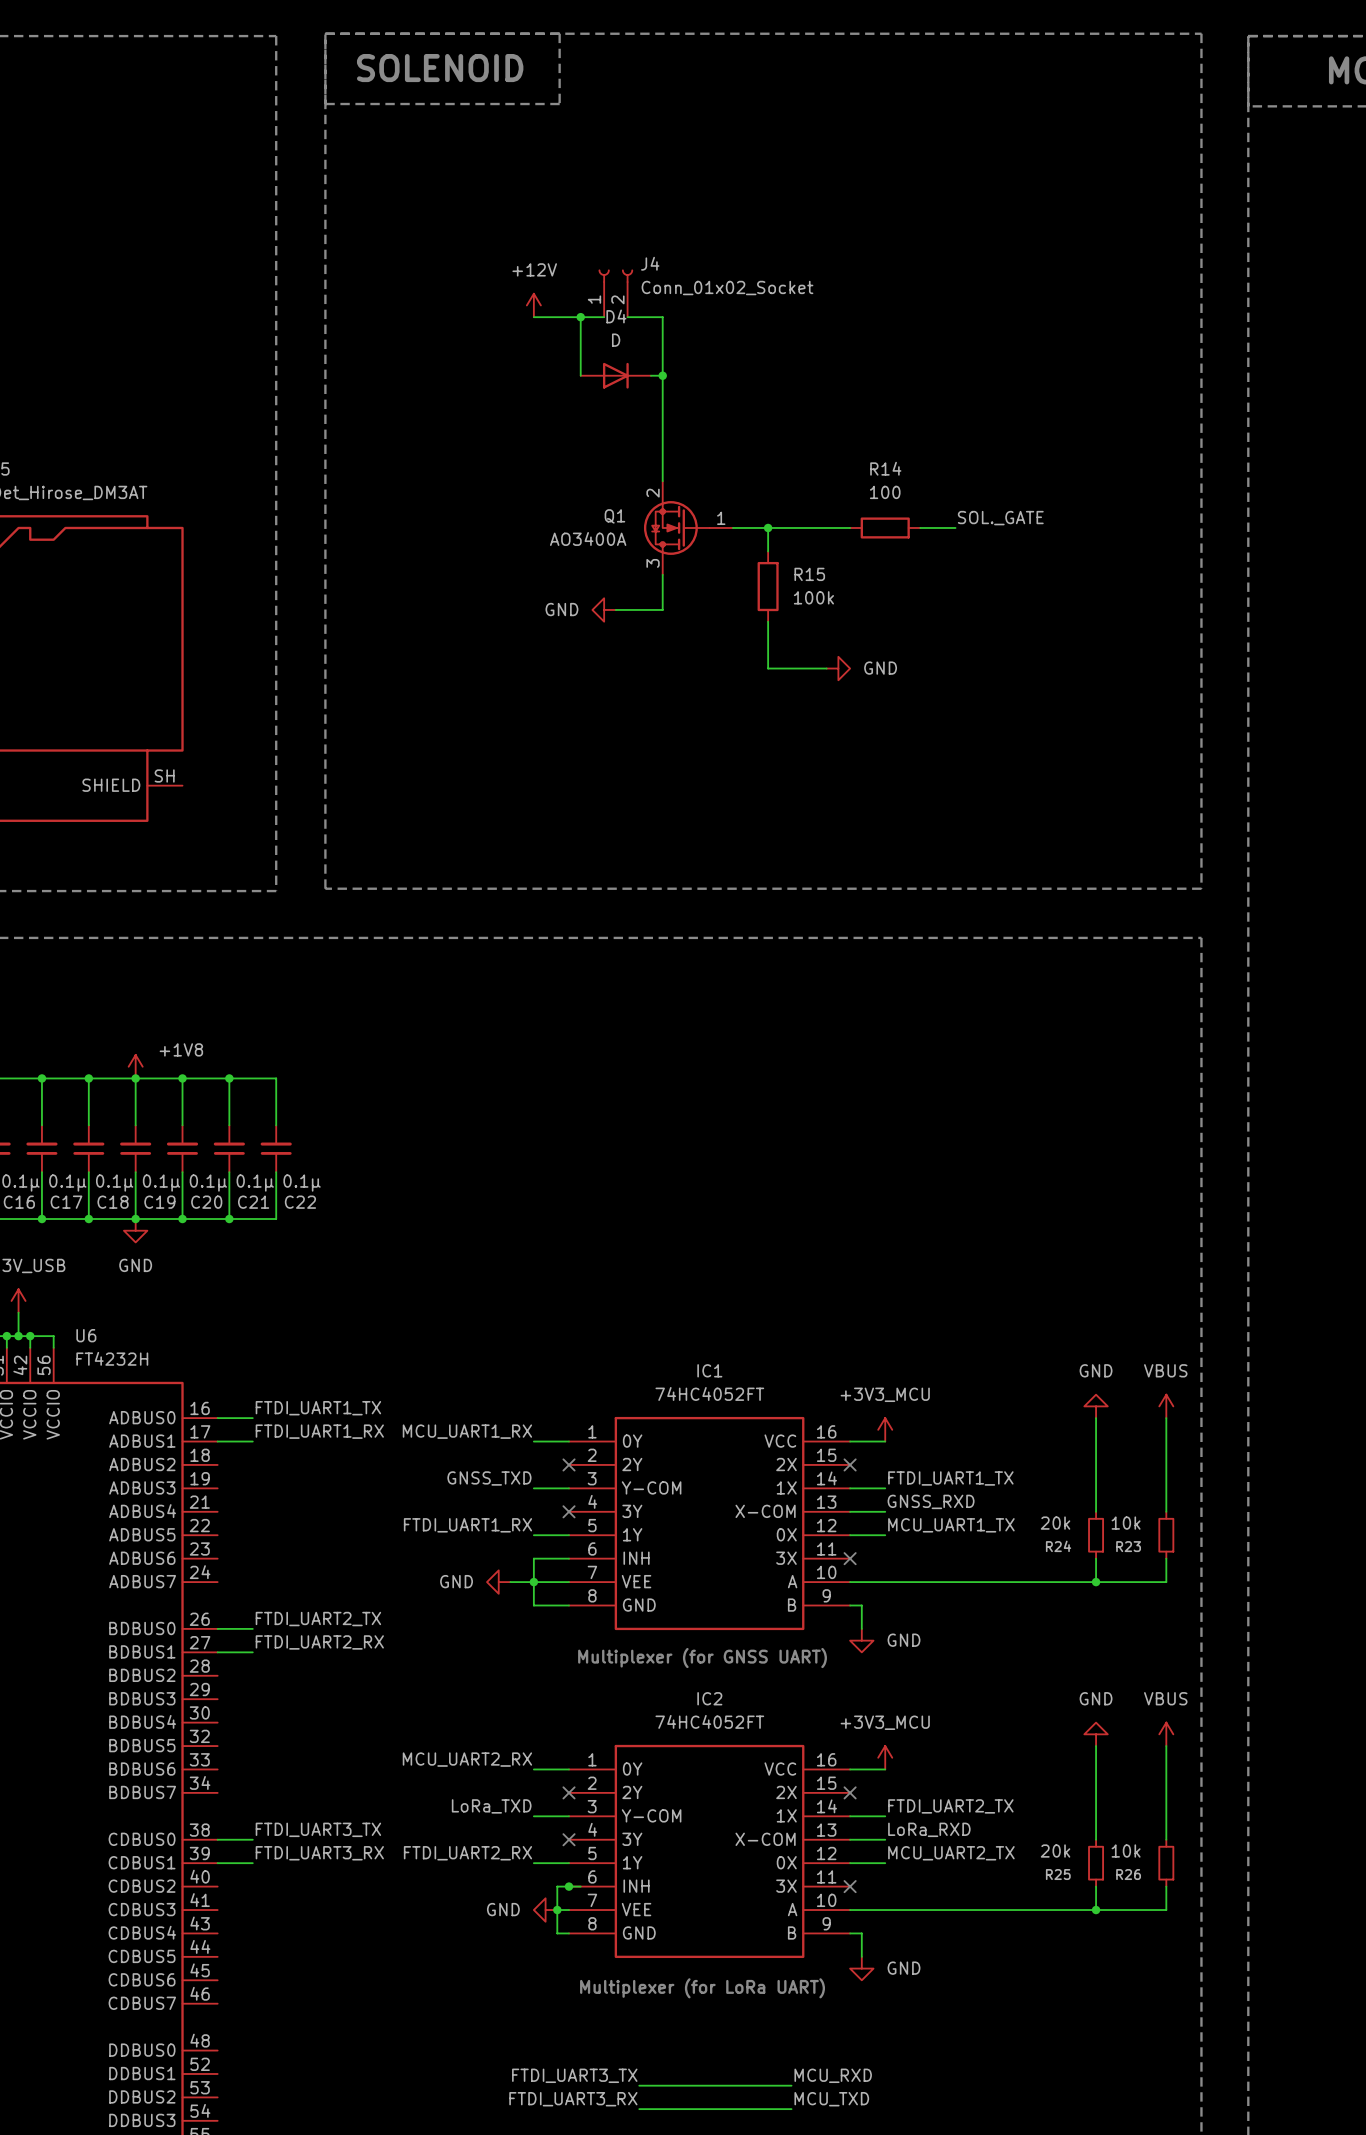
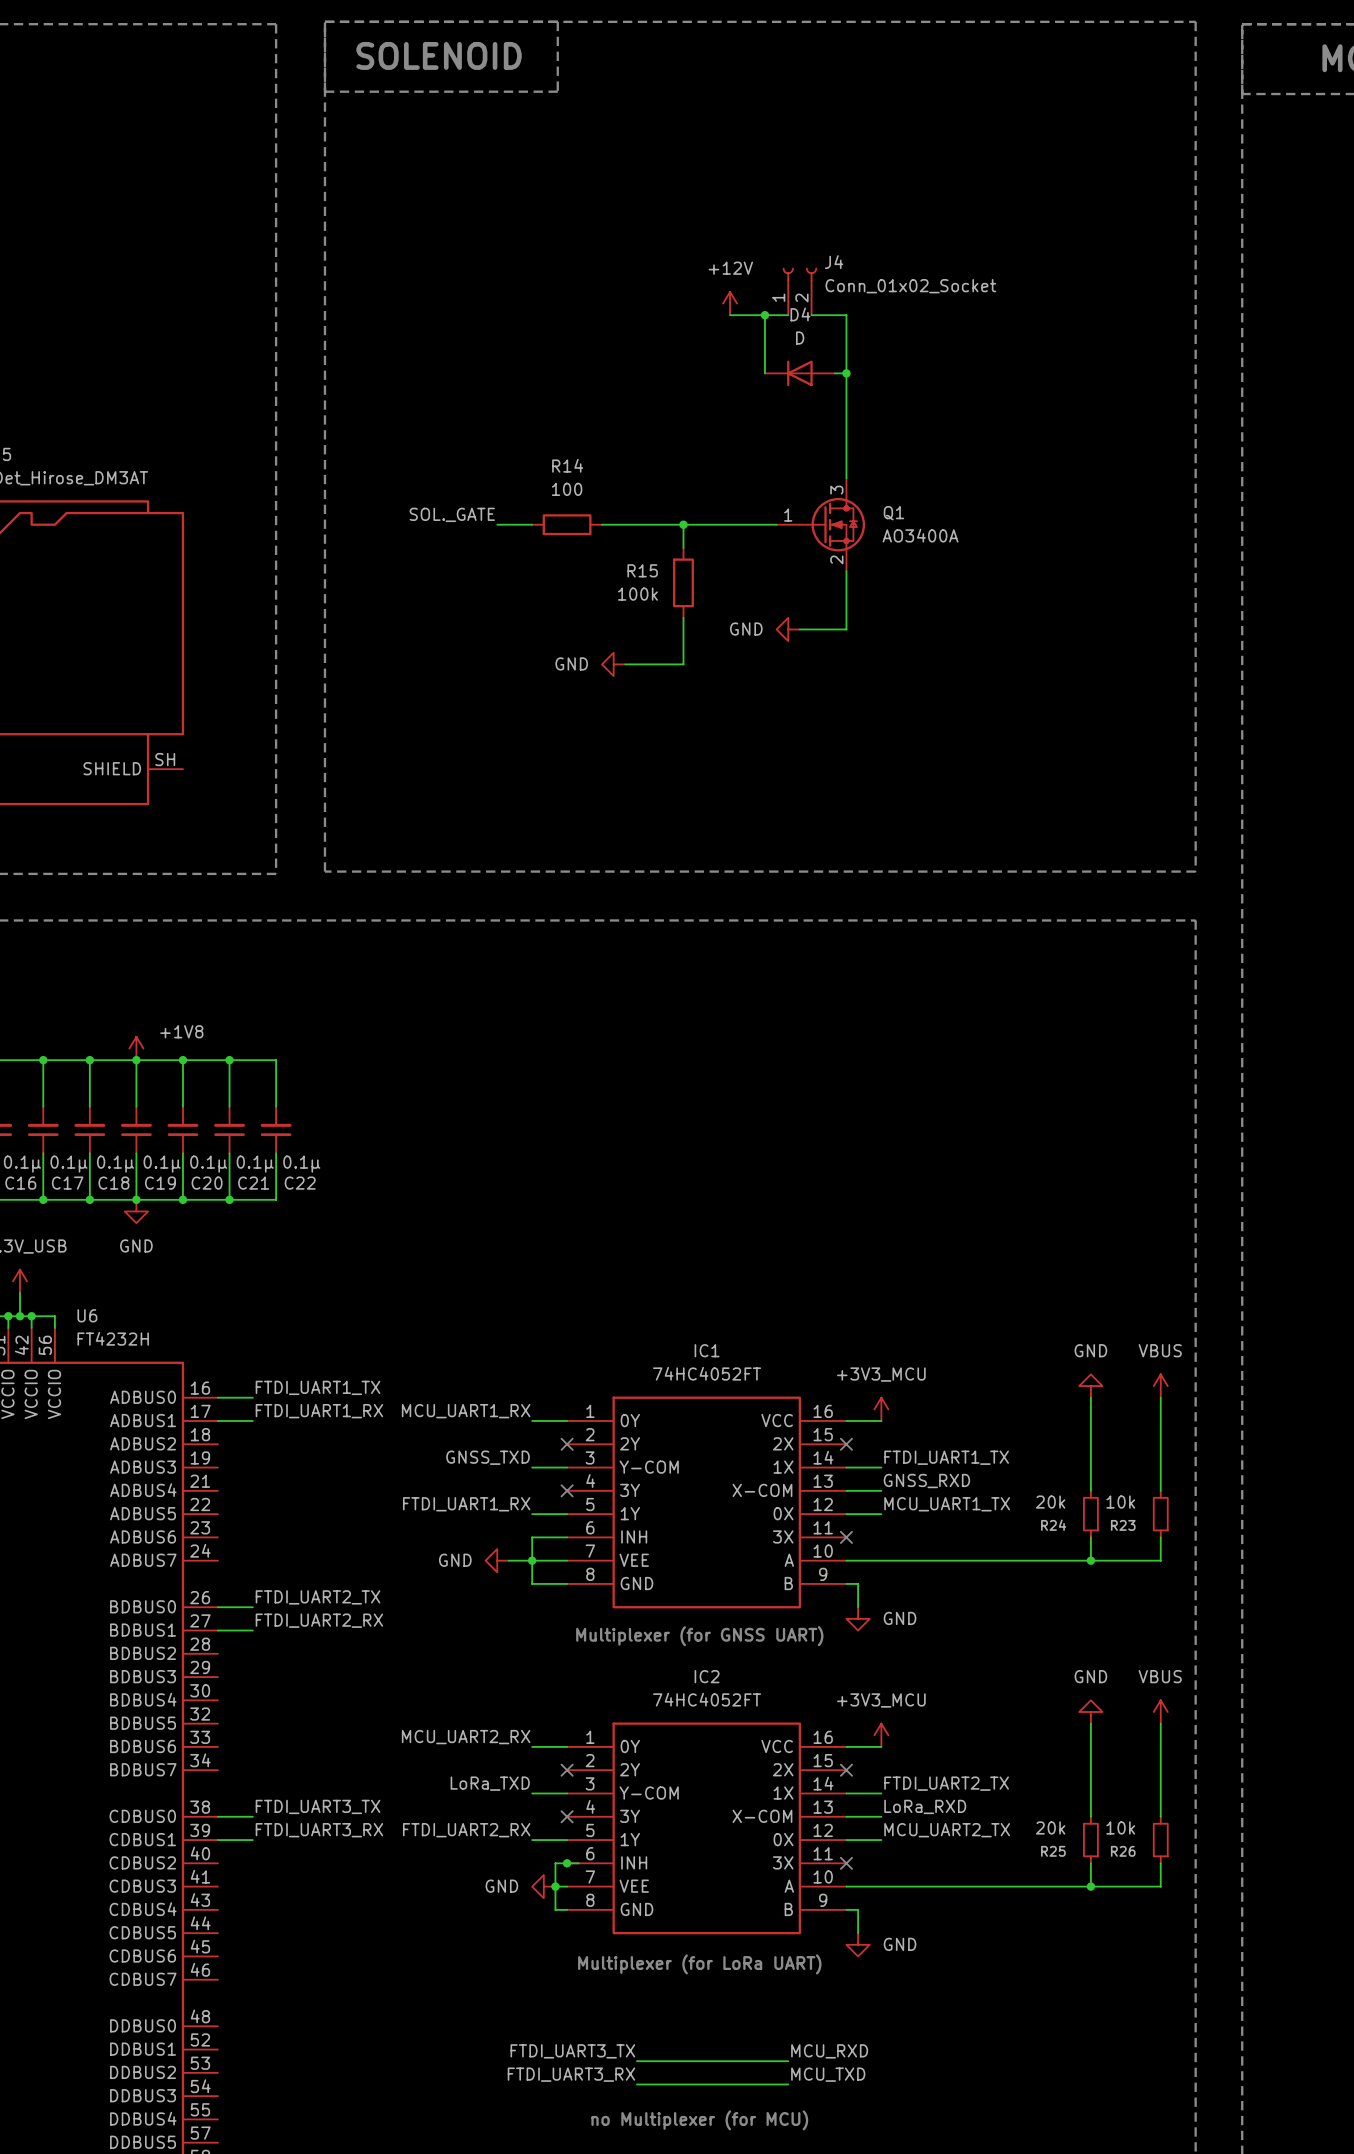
J4 position: (615, 293) -> (799, 291)
power symbol position: +12V (533, 305) -> +12V (730, 303)
wire: (533, 317) (604, 317) -> none
wire: (580, 317) (580, 375) -> (764, 315) (764, 373)
junction: (580, 317) -> none
wire: (627, 317) (662, 317) (662, 481) -> (811, 315) (846, 315) (846, 478)
wire: none -> (730, 315) (788, 315)
junction: none -> (764, 315)
D4 rotation: 0° (615, 375) -> 180° (799, 373)
D4 position: (615, 375) -> (799, 373)
wire: (650, 375) (662, 375) -> (834, 373) (846, 373)
junction: (662, 375) -> none
junction: none -> (846, 373)
Q1 name position: Q1 (614, 516) -> Q1 (893, 513)
label: SOL._GATE (1000, 518) -> none
Q1 rotation: 0° (676, 527) -> 180° (832, 524)
Q1 position: (688, 527) -> (820, 524)
wire: (732, 527) (850, 527) -> none
wire: (768, 527) (768, 551) -> (683, 524) (683, 547)
junction: (768, 527) -> none
R14 position: (885, 527) -> (567, 524)
wire: (920, 527) (955, 527) -> none
label: none -> SOL._GATE (452, 514)
Q1 value position: AO3400A (588, 538) -> AO3400A (920, 535)
wire: none -> (497, 524) (532, 524)
wire: none -> (602, 524) (776, 524)
junction: none -> (683, 524)
wire: (662, 574) (662, 609) (615, 609) -> none
R15 name position: R15 (809, 574) -> R15 (642, 570)
R15 position: (768, 586) -> (683, 582)
wire: none -> (846, 571) (846, 629) (799, 629)
R15 value position: 100k (813, 597) -> 100k (637, 594)
power symbol position: GND (604, 609) -> GND (613, 664)
wire: (768, 621) (768, 668) (826, 668) -> none
wire: none -> (683, 617) (683, 664) (625, 664)
power symbol rotation: 0° (838, 668) -> 180° (788, 629)
power symbol position: GND (838, 668) -> GND (788, 629)

